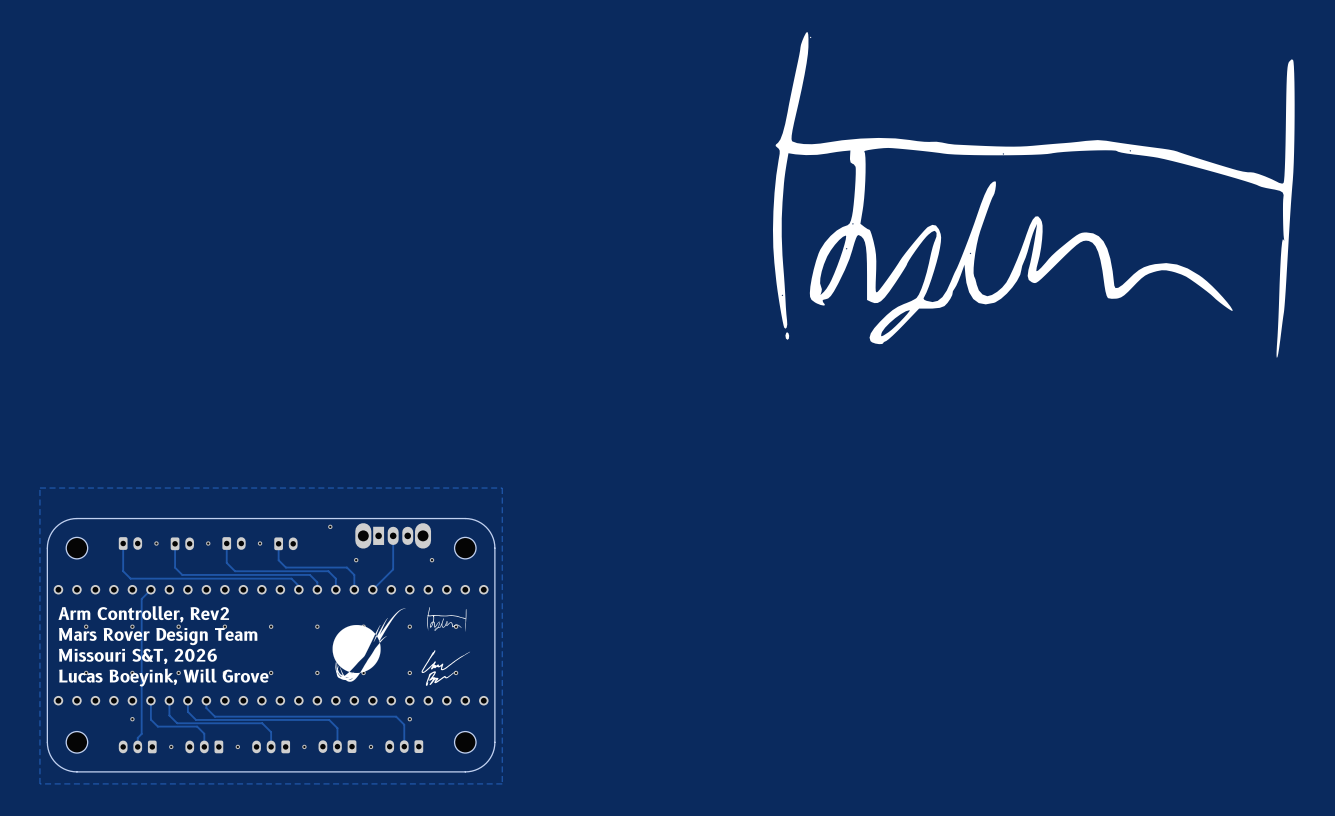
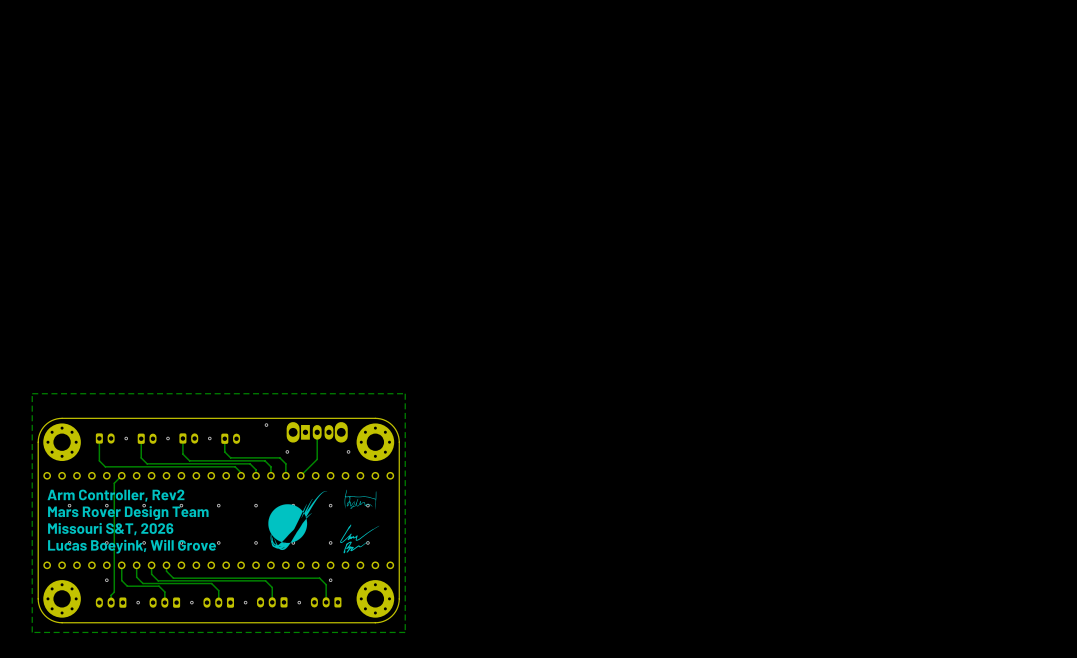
drawing: [772, 31, 1295, 358] -> none
part footprint: [66, 537, 88, 559] -> [43, 423, 81, 462]
part footprint: [454, 537, 477, 559] -> [356, 423, 395, 462]
part footprint: [66, 731, 88, 754] -> [43, 580, 81, 618]
part footprint: [454, 731, 477, 754] -> [356, 580, 395, 618]

